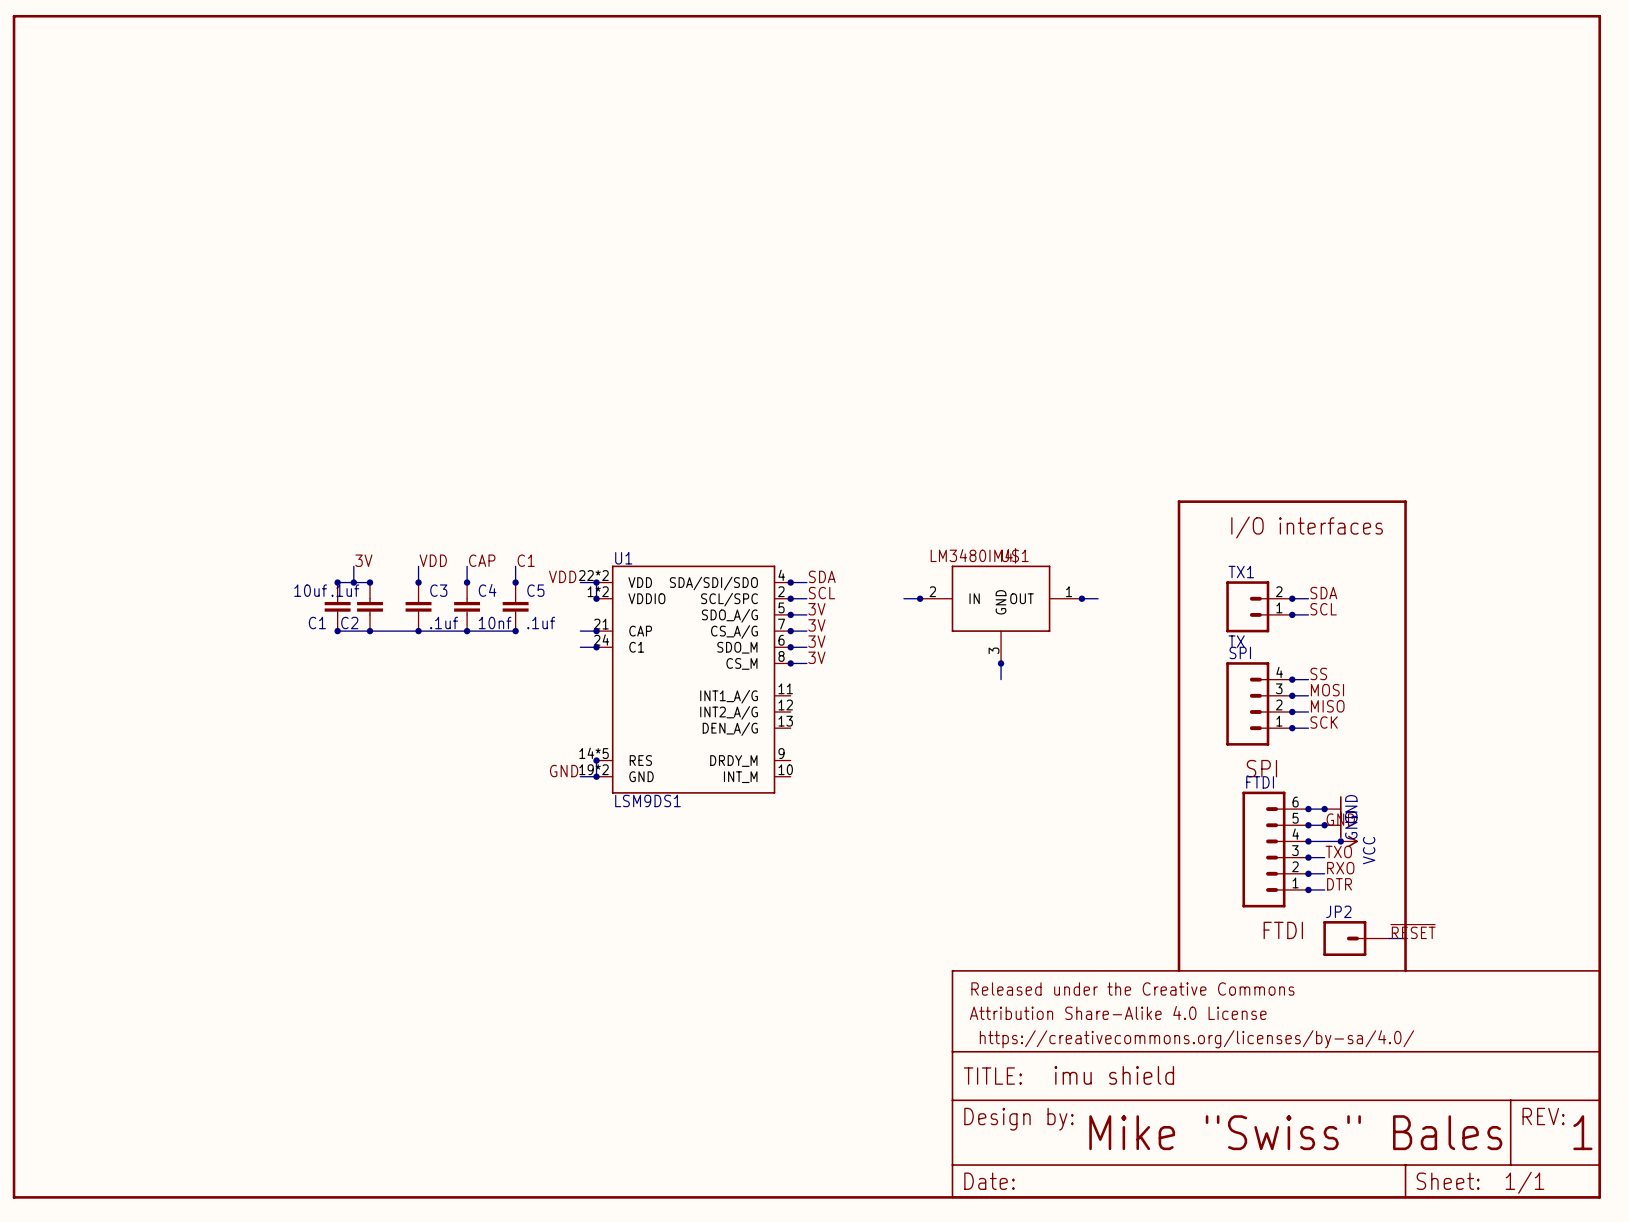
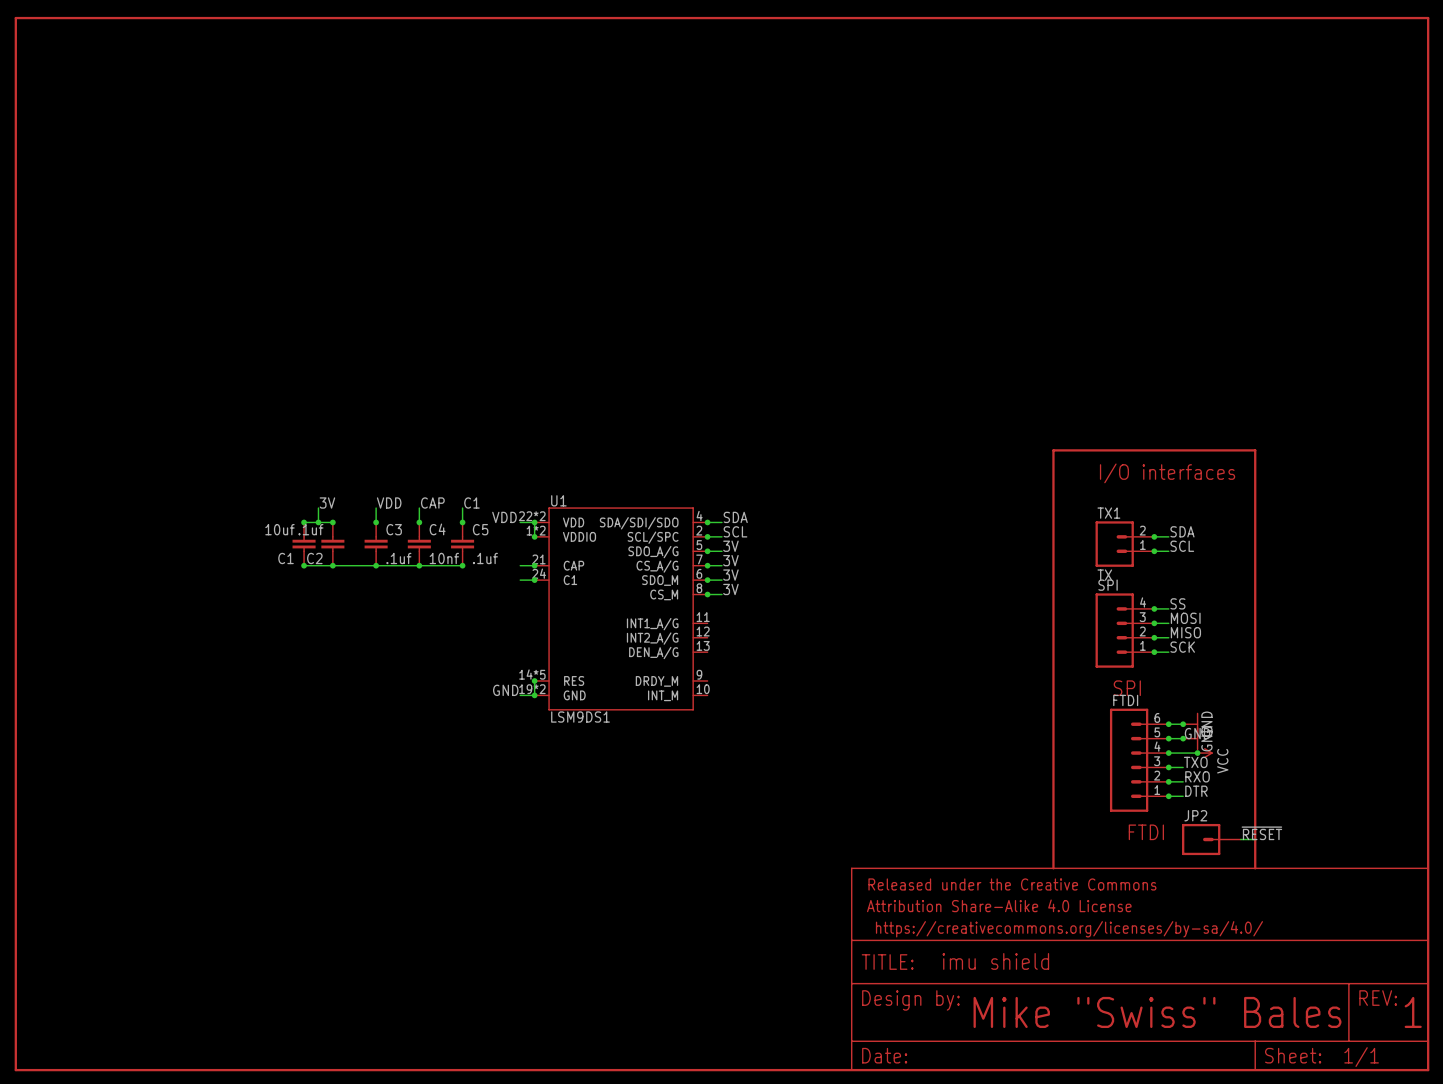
wire: (903, 598) (920, 598) -> none
junction: (920, 598) -> none
wire: (1081, 598) (1098, 598) -> none
junction: (1081, 598) -> none
U$1: LM3480IM4 (1001, 614) -> none
wire: (1001, 663) (1001, 679) -> none
junction: (1001, 663) -> none

